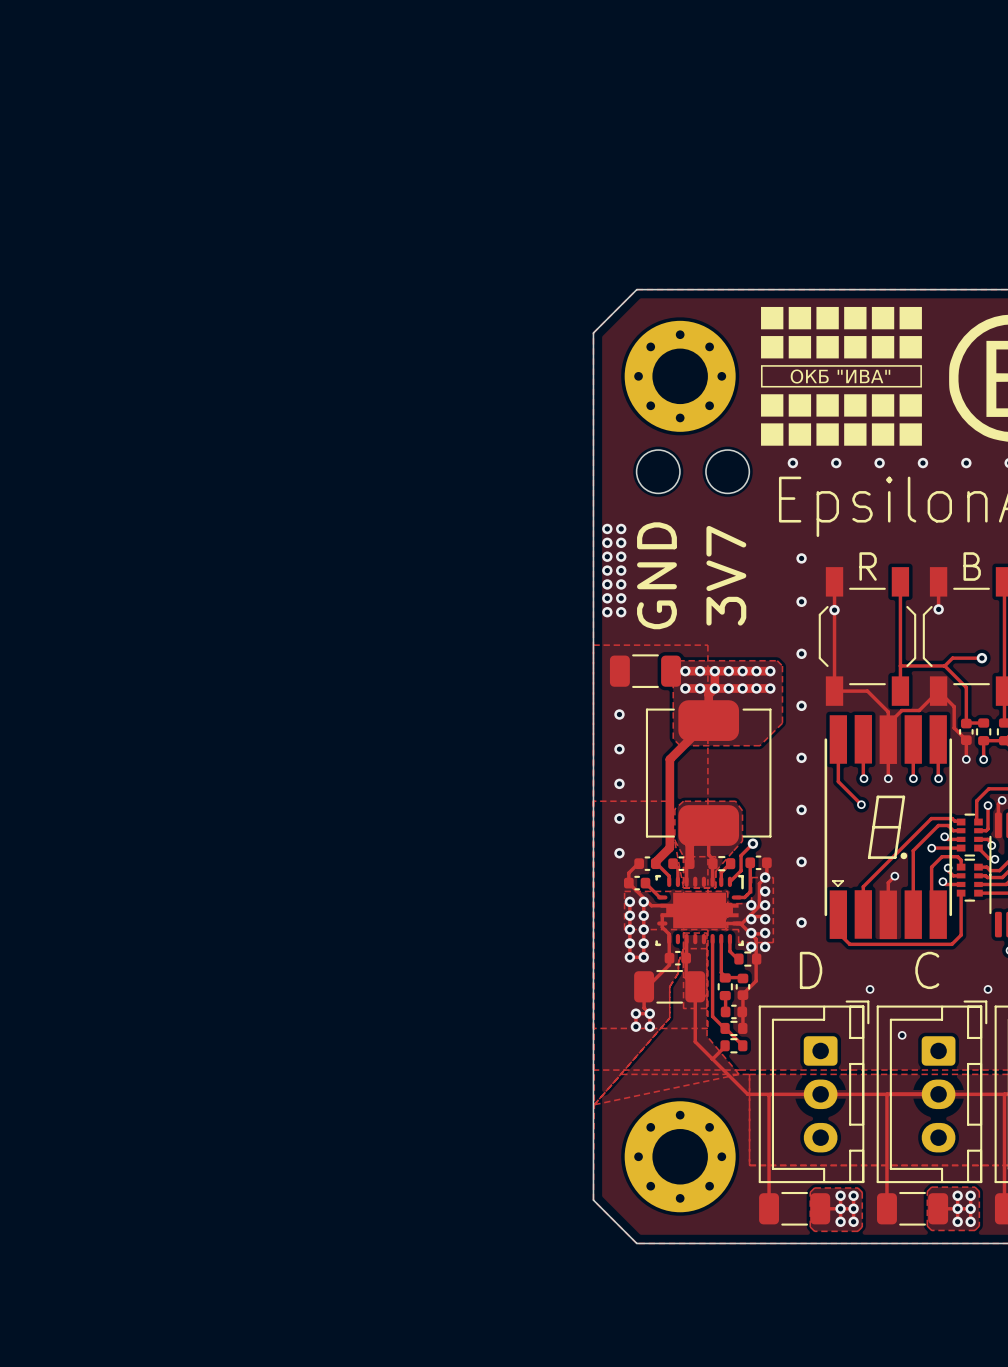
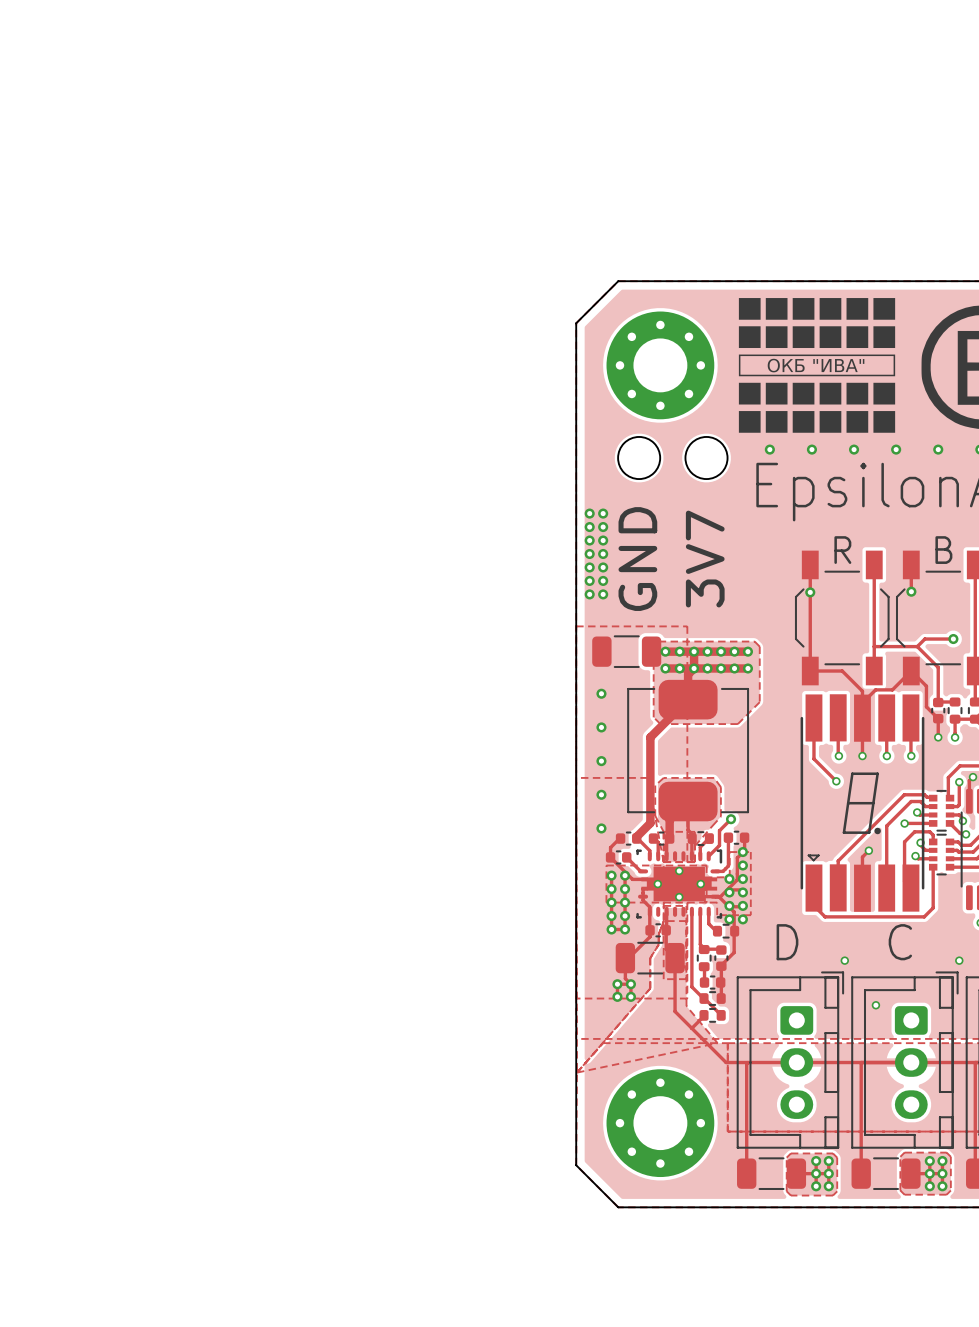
via: (801, 558) -> none
via: (801, 601) -> none
via: (801, 653) -> none
via: (801, 705) -> none
via: (801, 757) -> none
via: (801, 809) -> none
via: (801, 861) -> none
part footprint: [655, 874, 744, 947] -> [636, 849, 723, 919]
via: (801, 922) -> none

